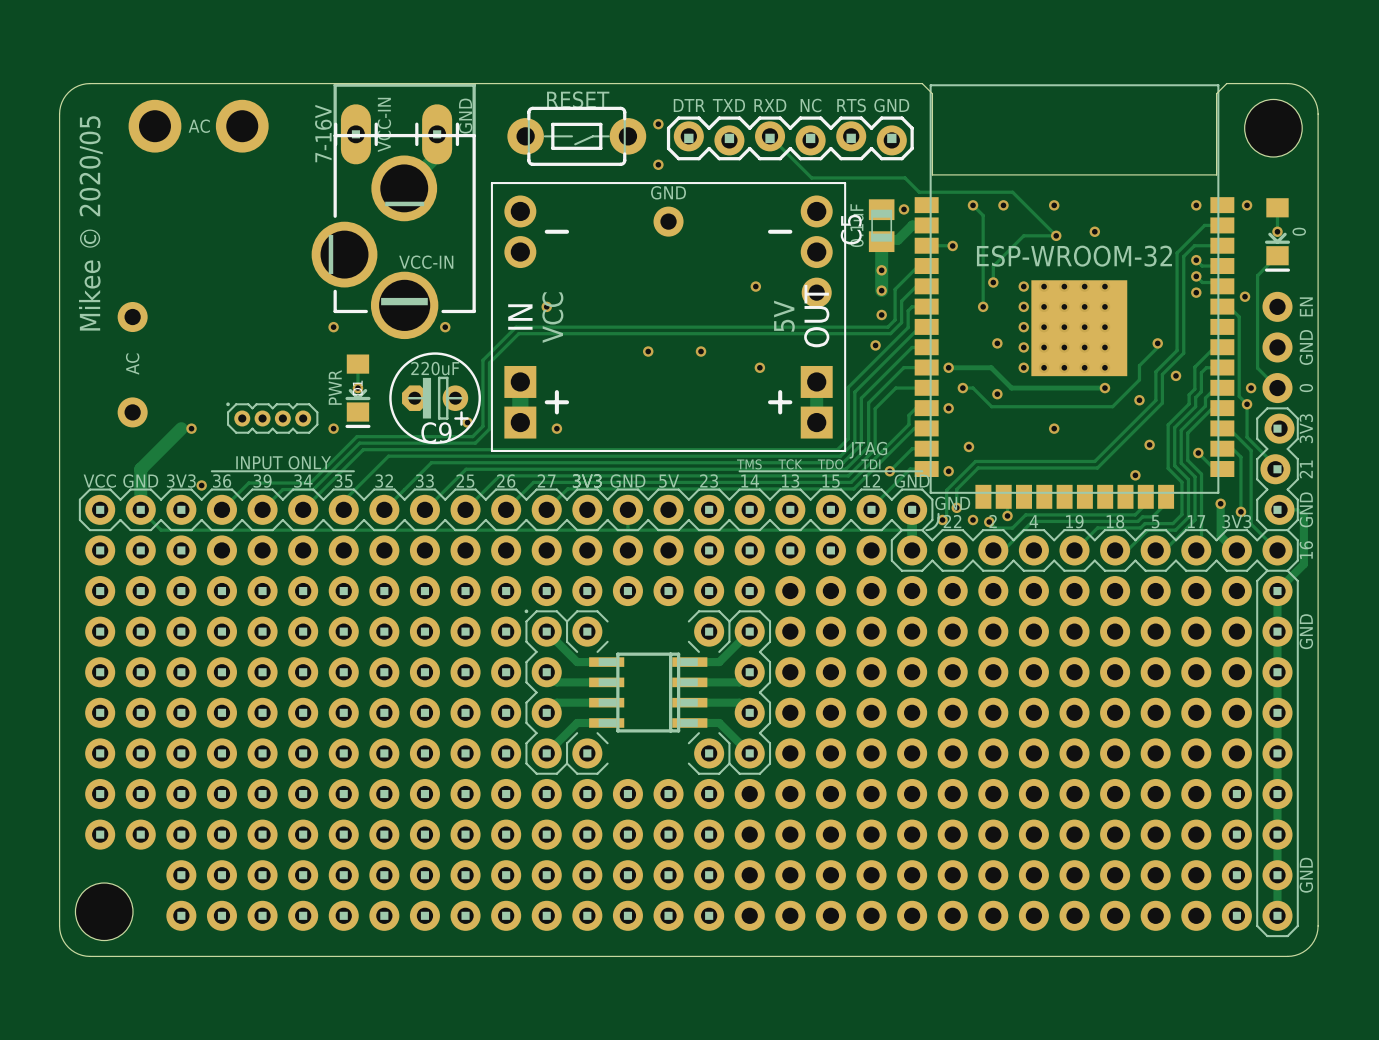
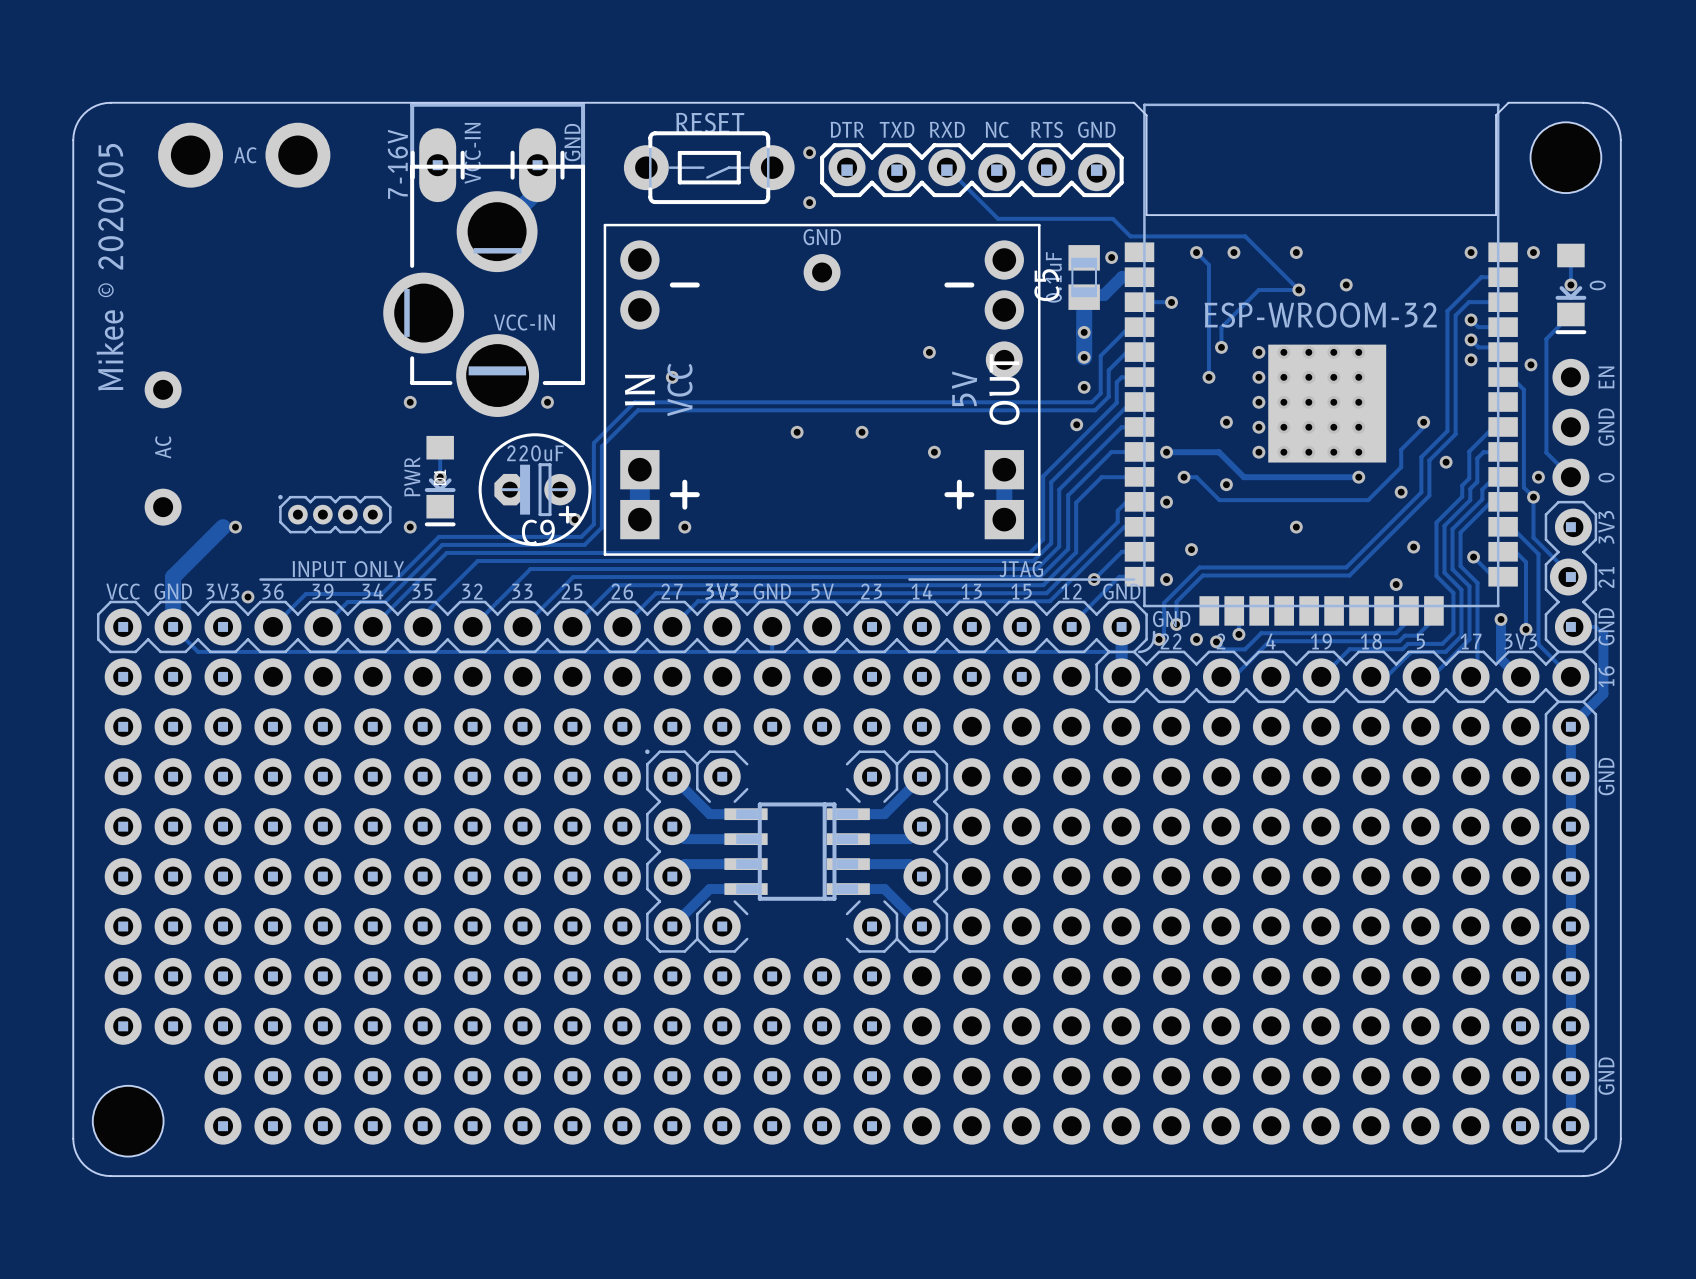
text: JTAG (868, 450) -> none
text: TMS (749, 464) -> none
text: TCK (790, 464) -> none
text: TDO (830, 464) -> JTAG (1021, 569)
text: TDI (870, 464) -> none

